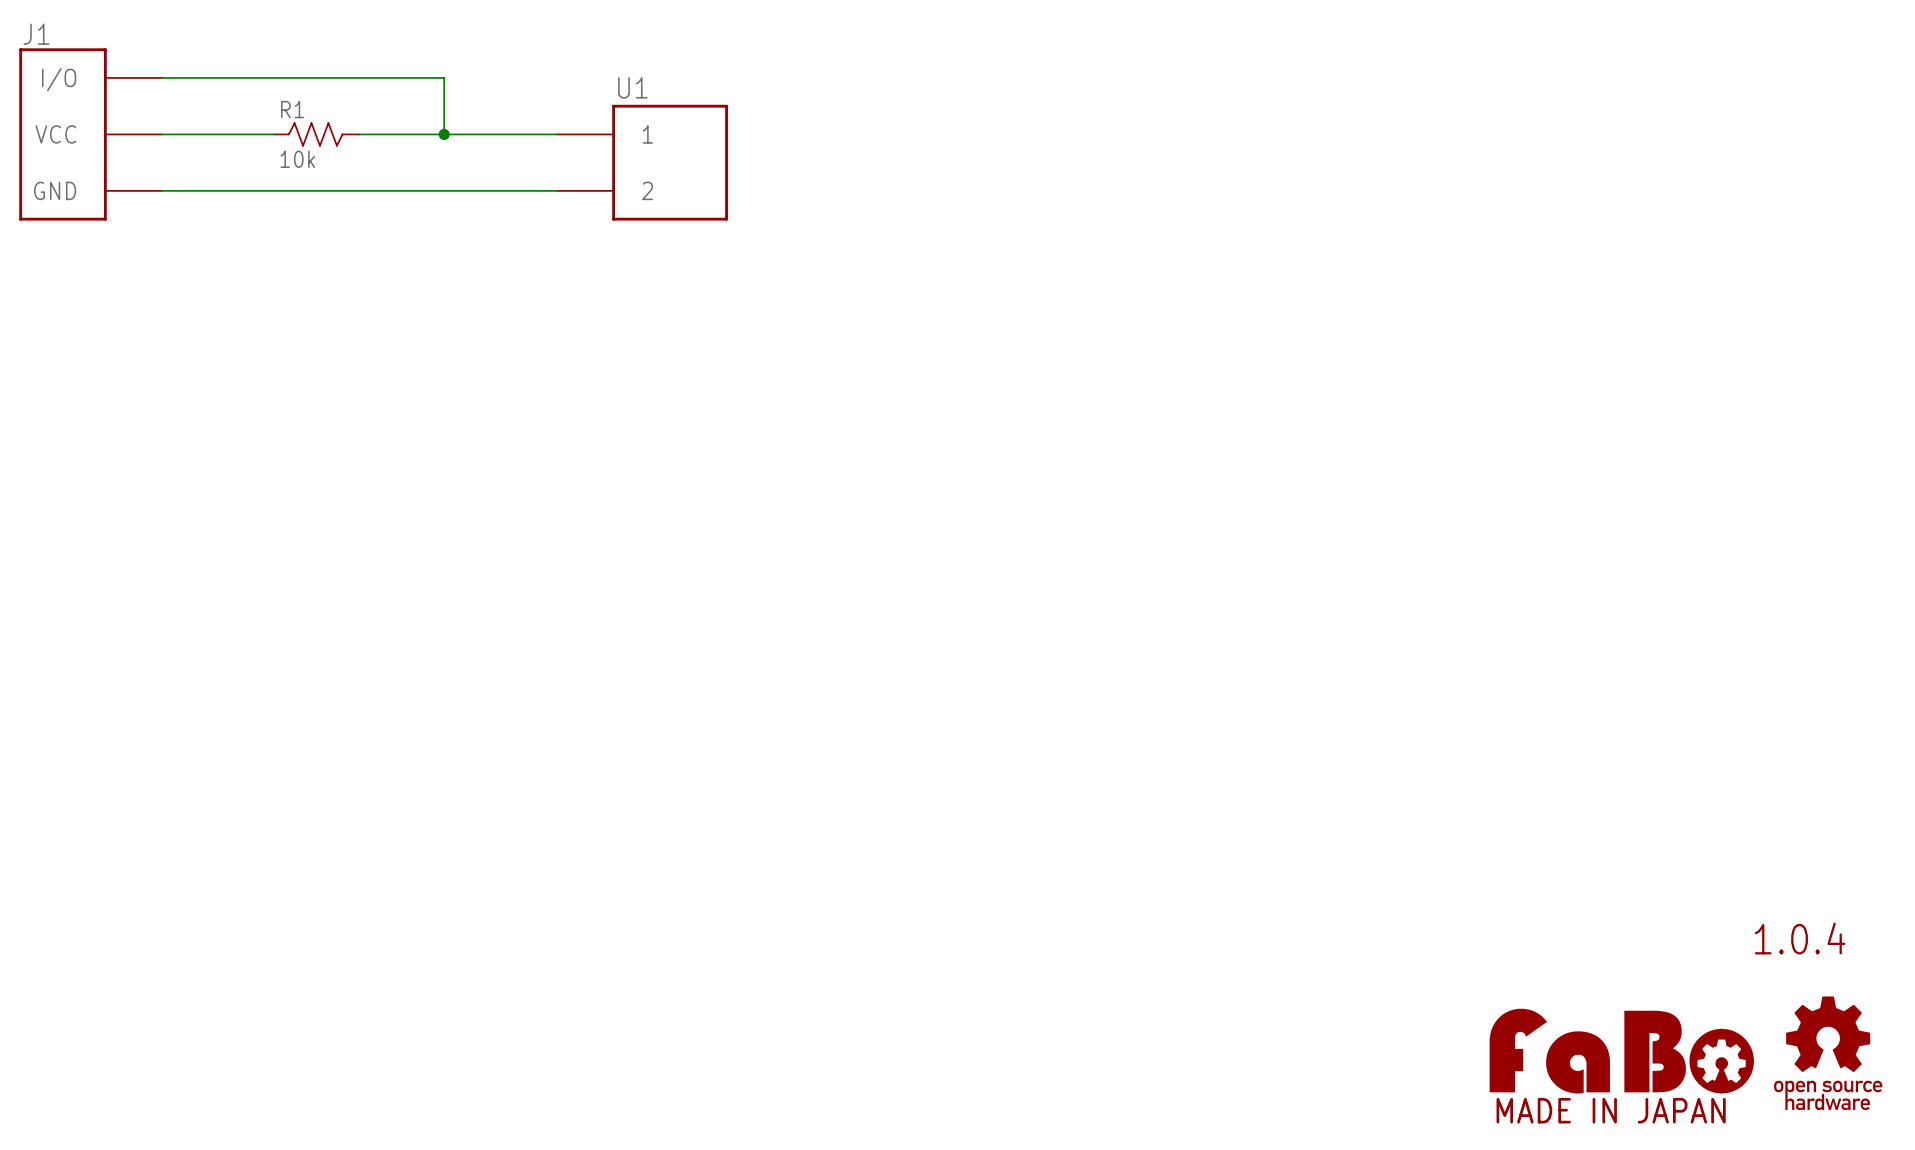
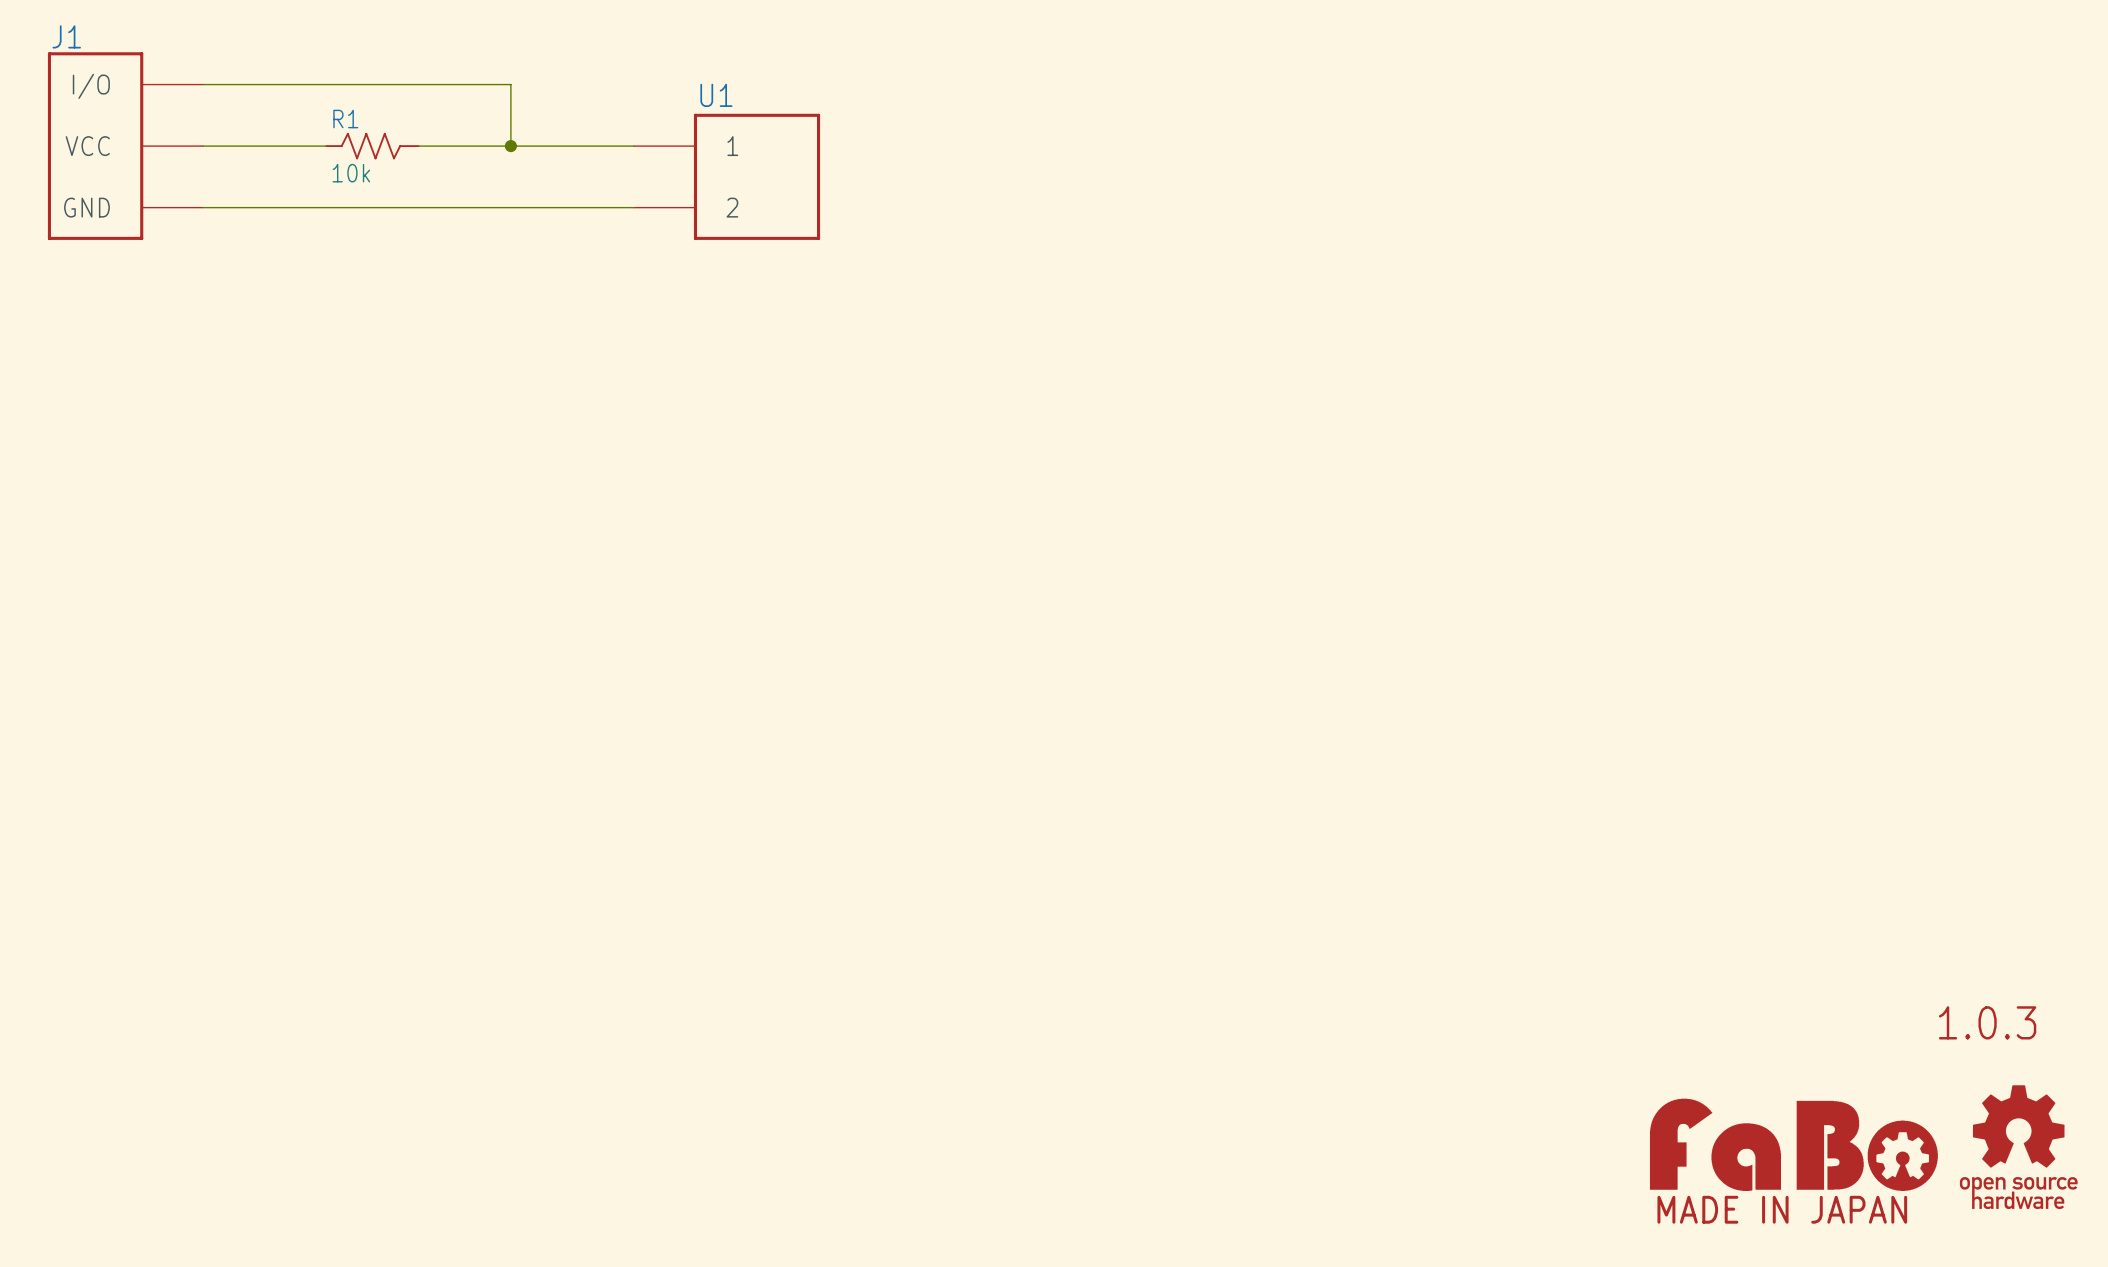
text: 1.0.4 (1800, 938) -> 1.0.3 (1987, 1022)

